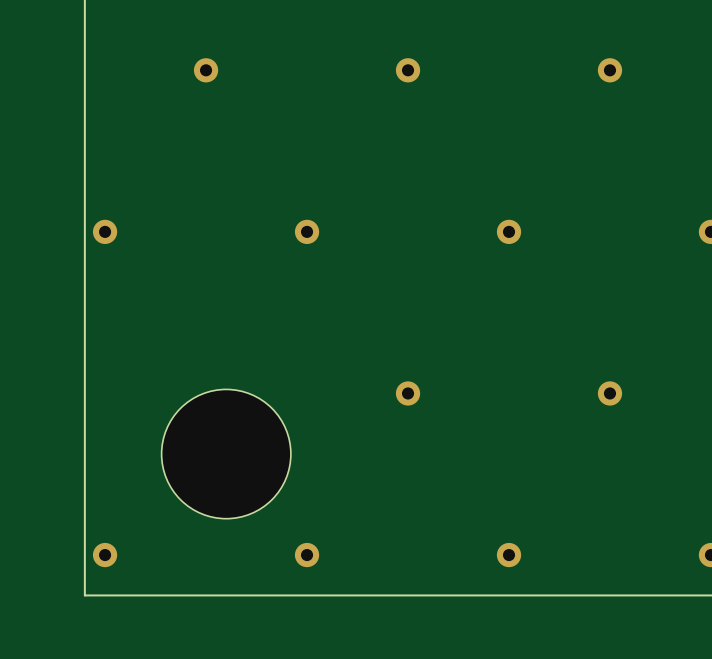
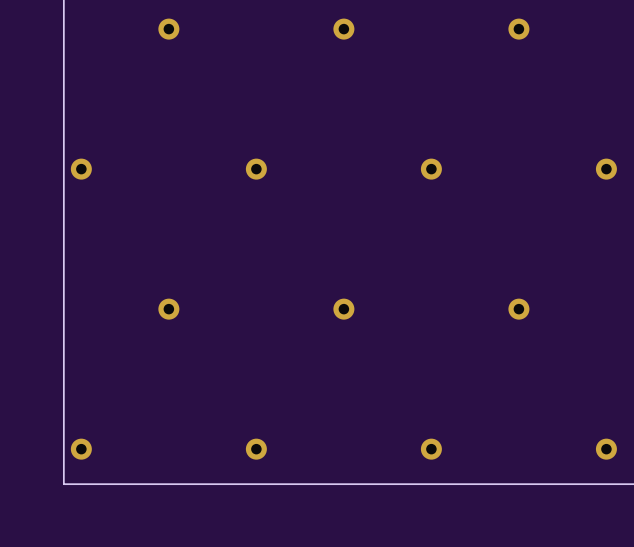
via: none -> (168, 309)
part: (226, 454) -> none

